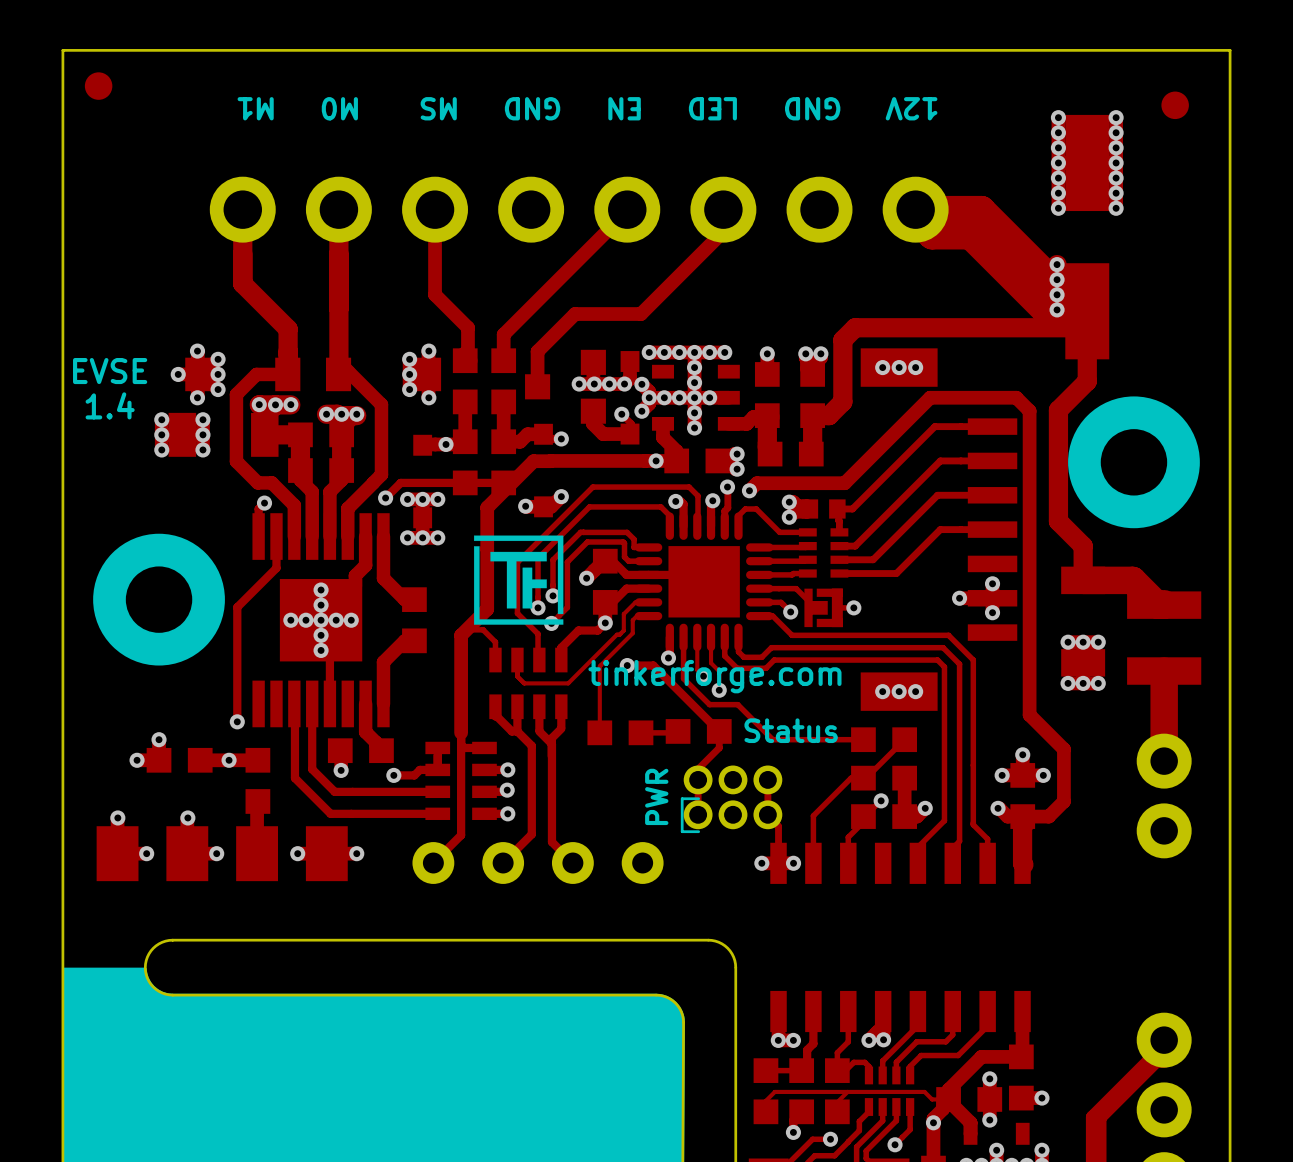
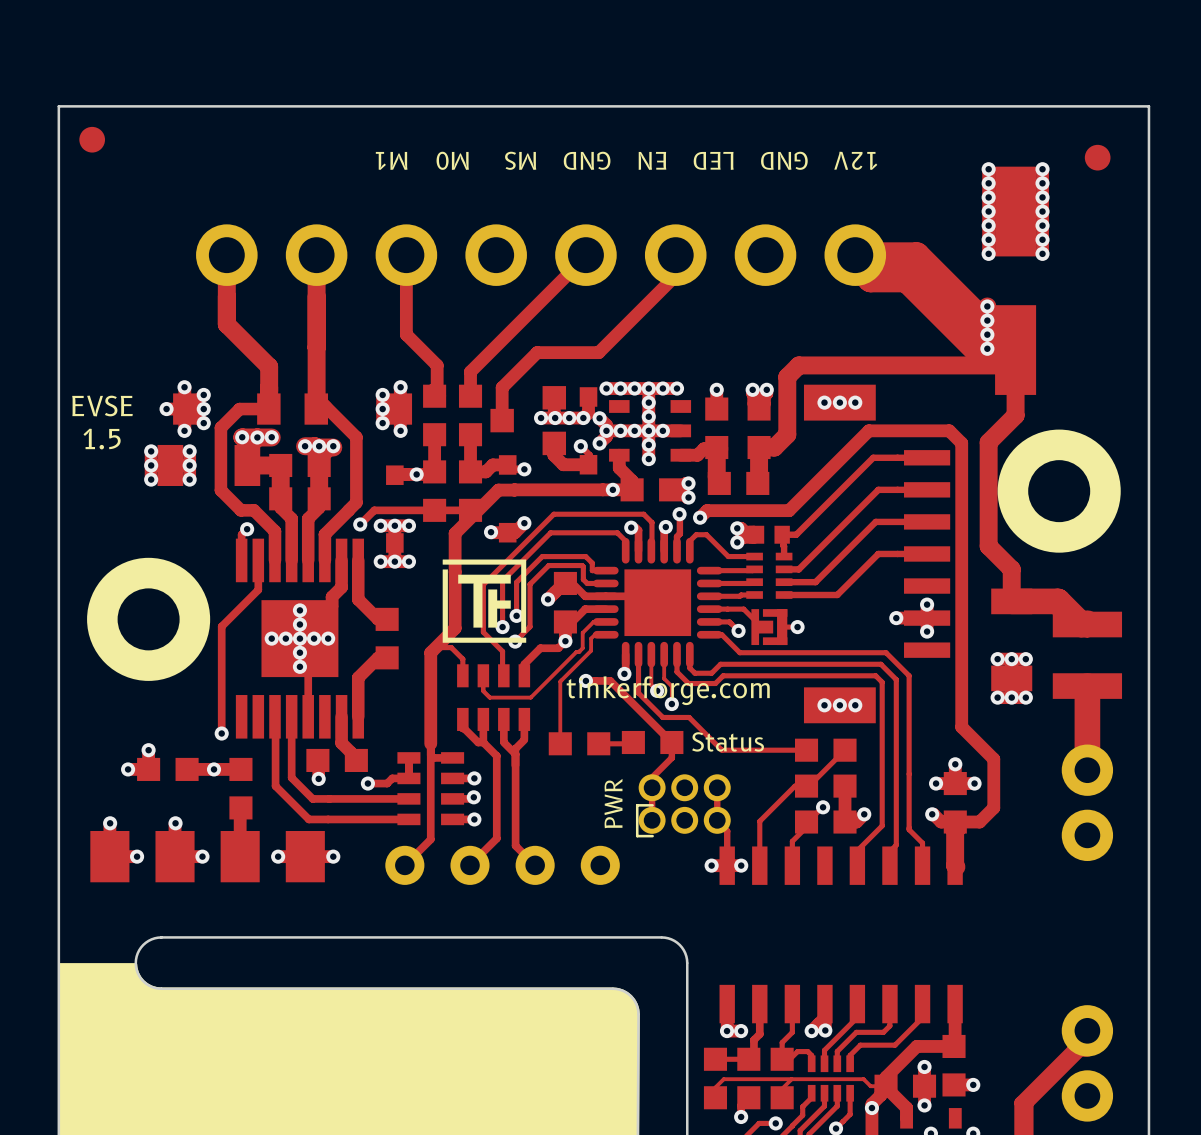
text: 1.4 (110, 405) -> 1.5 (102, 439)

